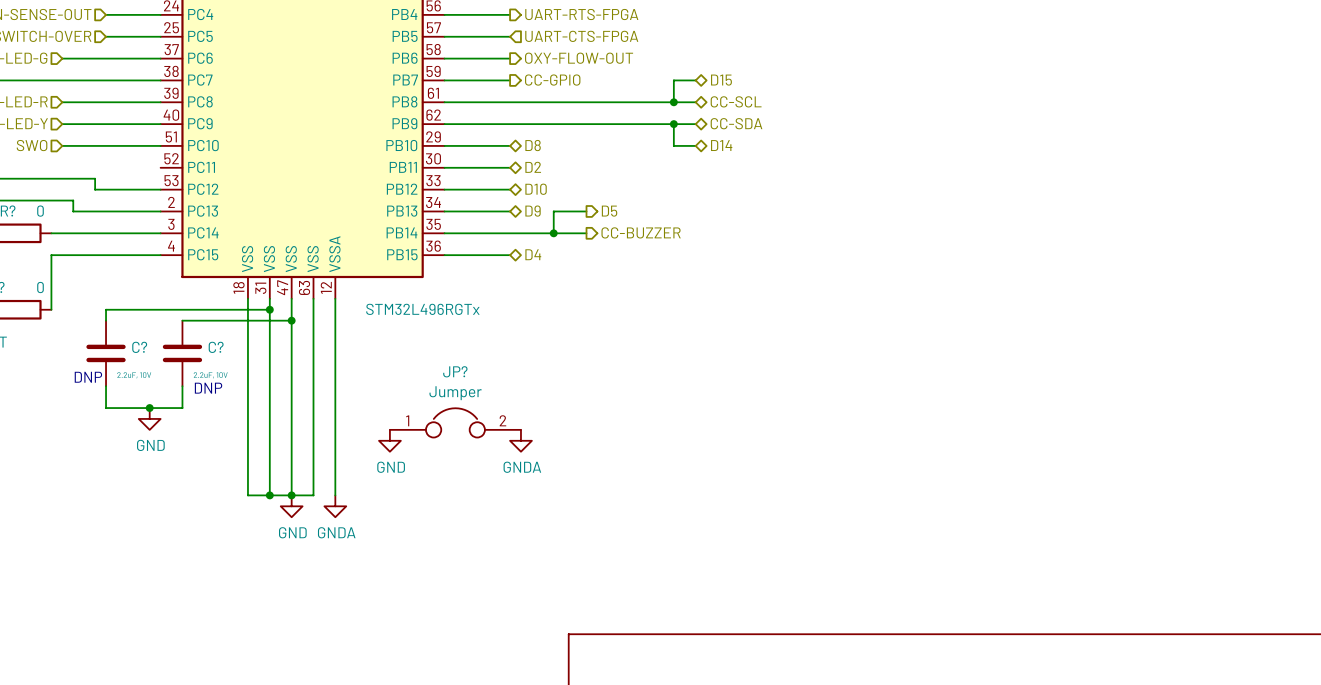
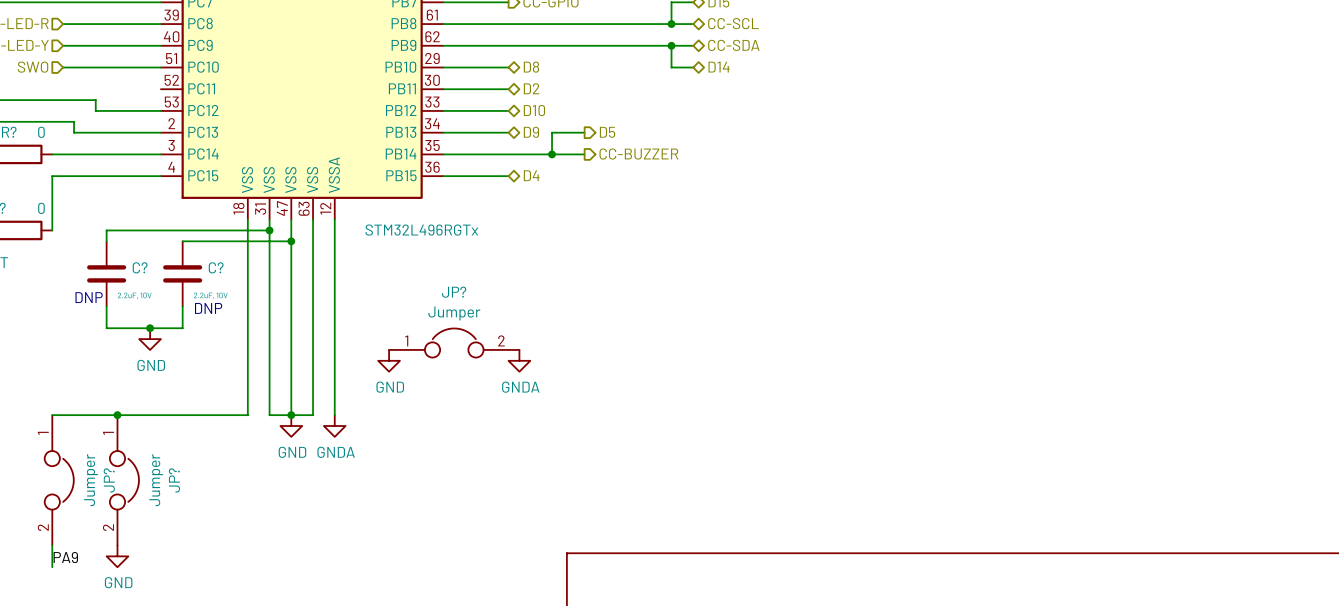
junction: none -> (117, 415)
wire: (247, 495) (269, 495) -> (247, 415) (52, 415)
junction: (269, 495) -> none
JP?: none -> Jumper (59, 480)
JP?: none -> Jumper (124, 480)
wire: none -> (52, 545) (52, 567)
power symbol: none -> GND (117, 556)
label: none -> PA9 (65, 557)

